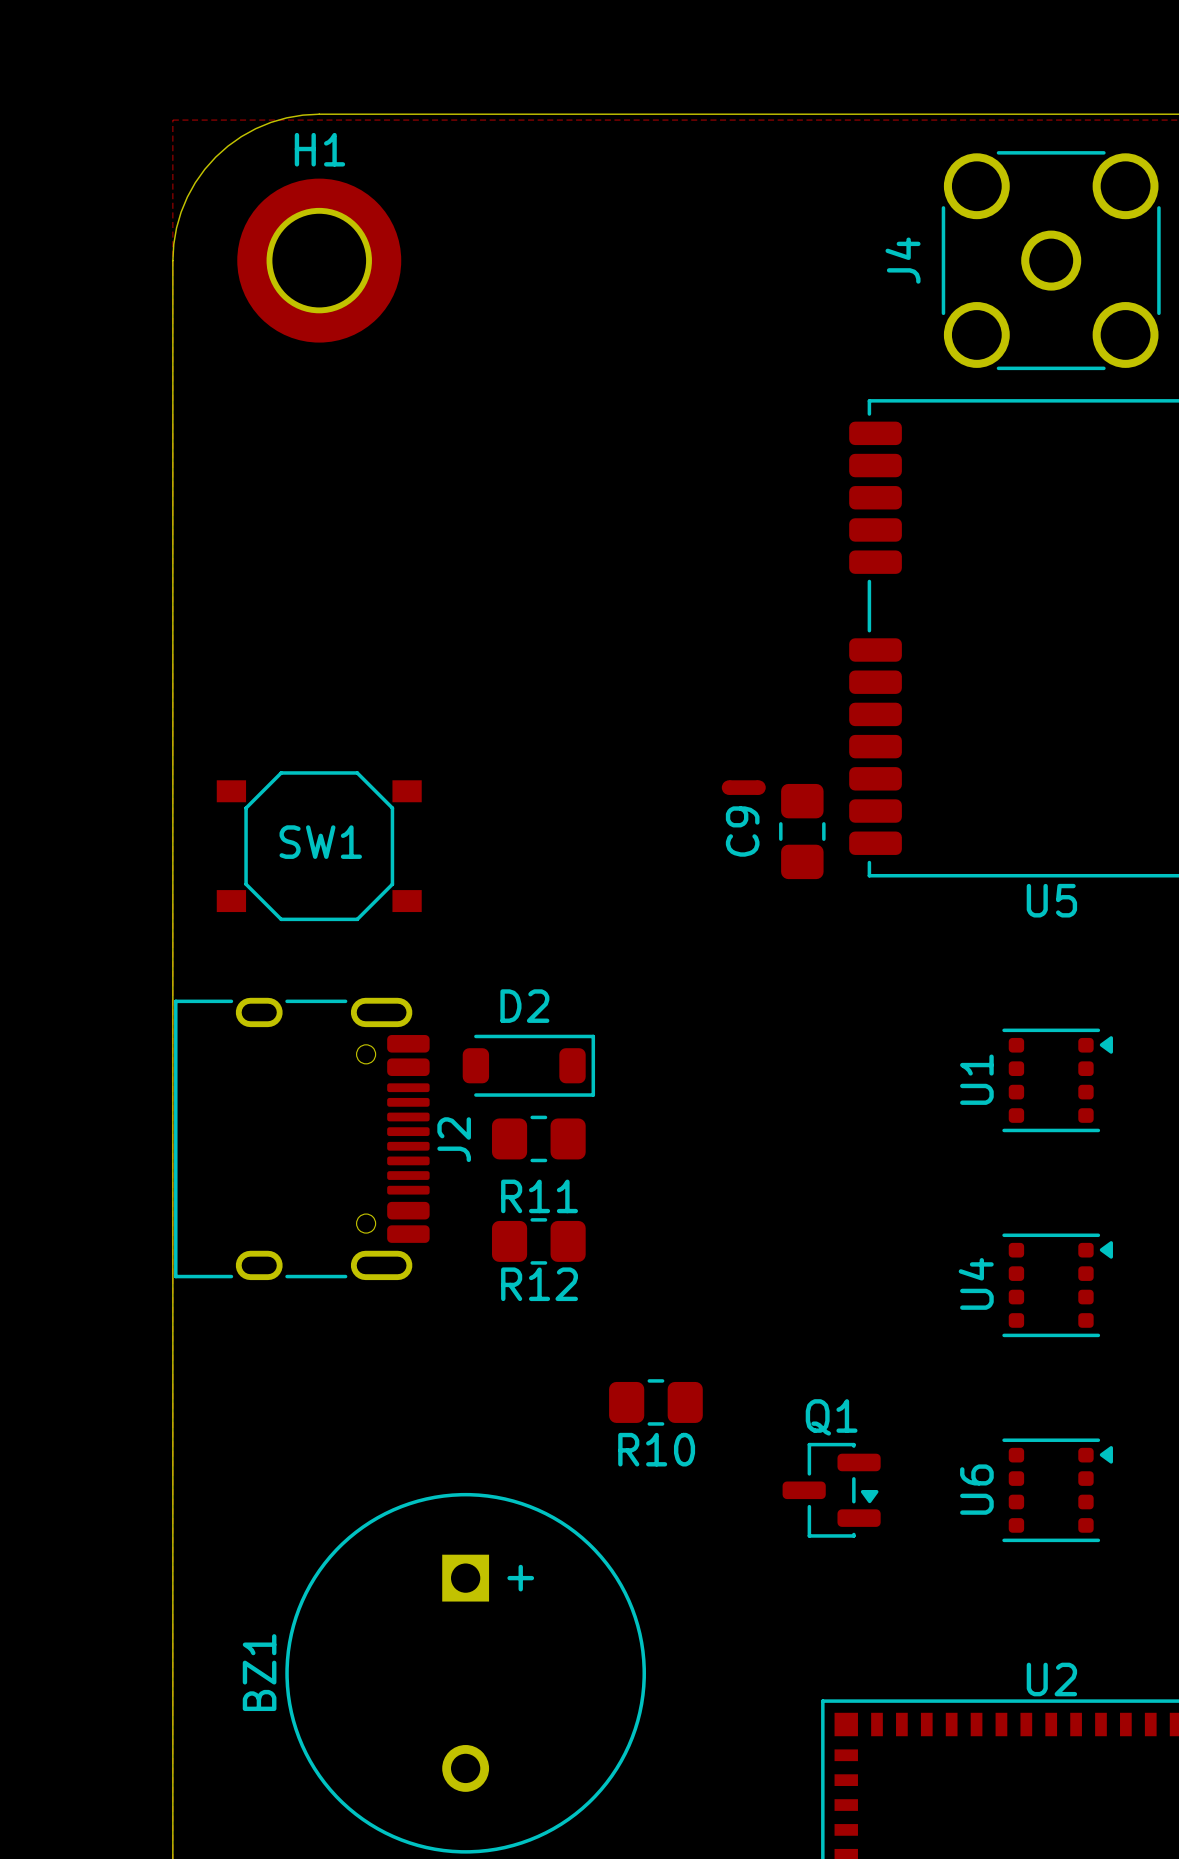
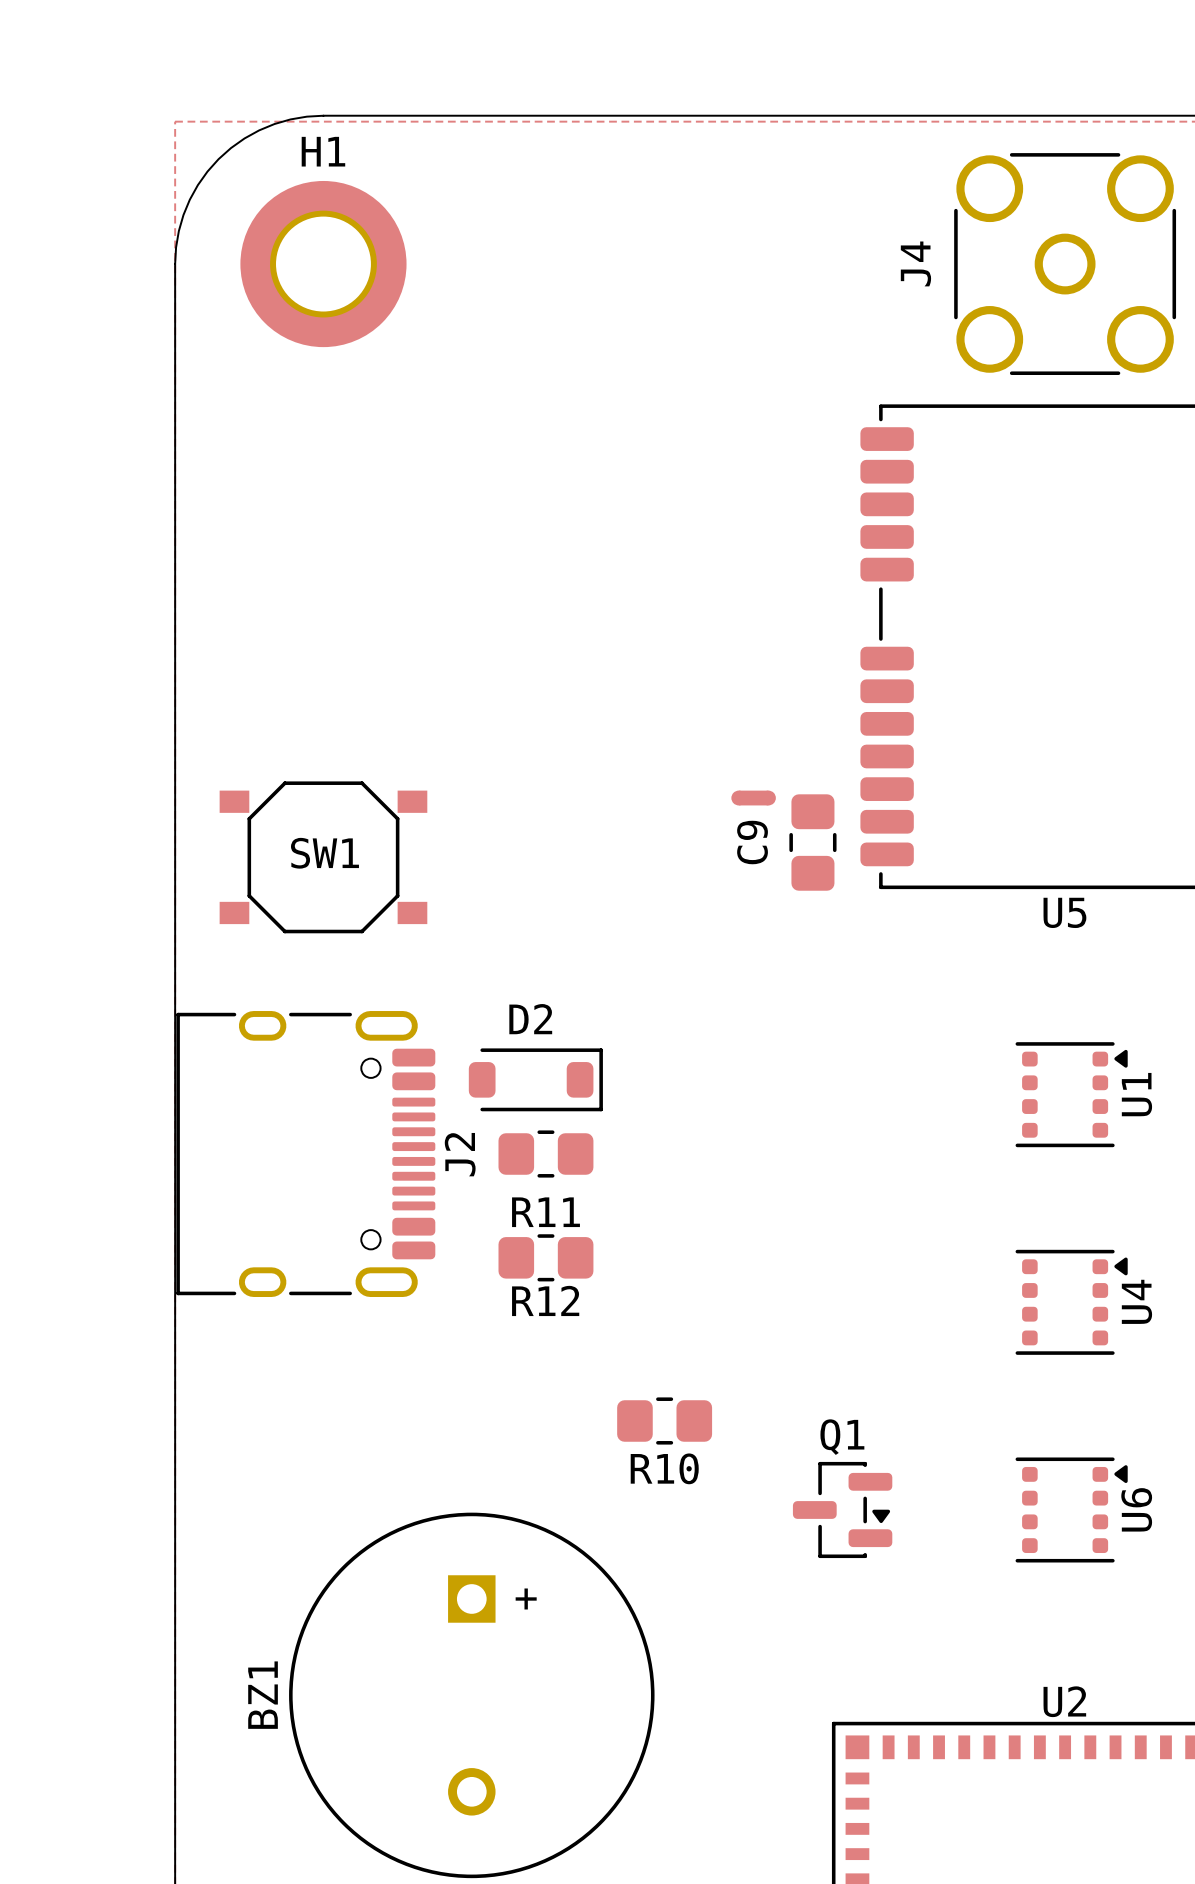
U1 name position: U1 (976, 1079) -> U1 (1136, 1094)
U4 name position: U4 (976, 1283) -> U4 (1136, 1301)
U6 name position: U6 (976, 1489) -> U6 (1136, 1509)

